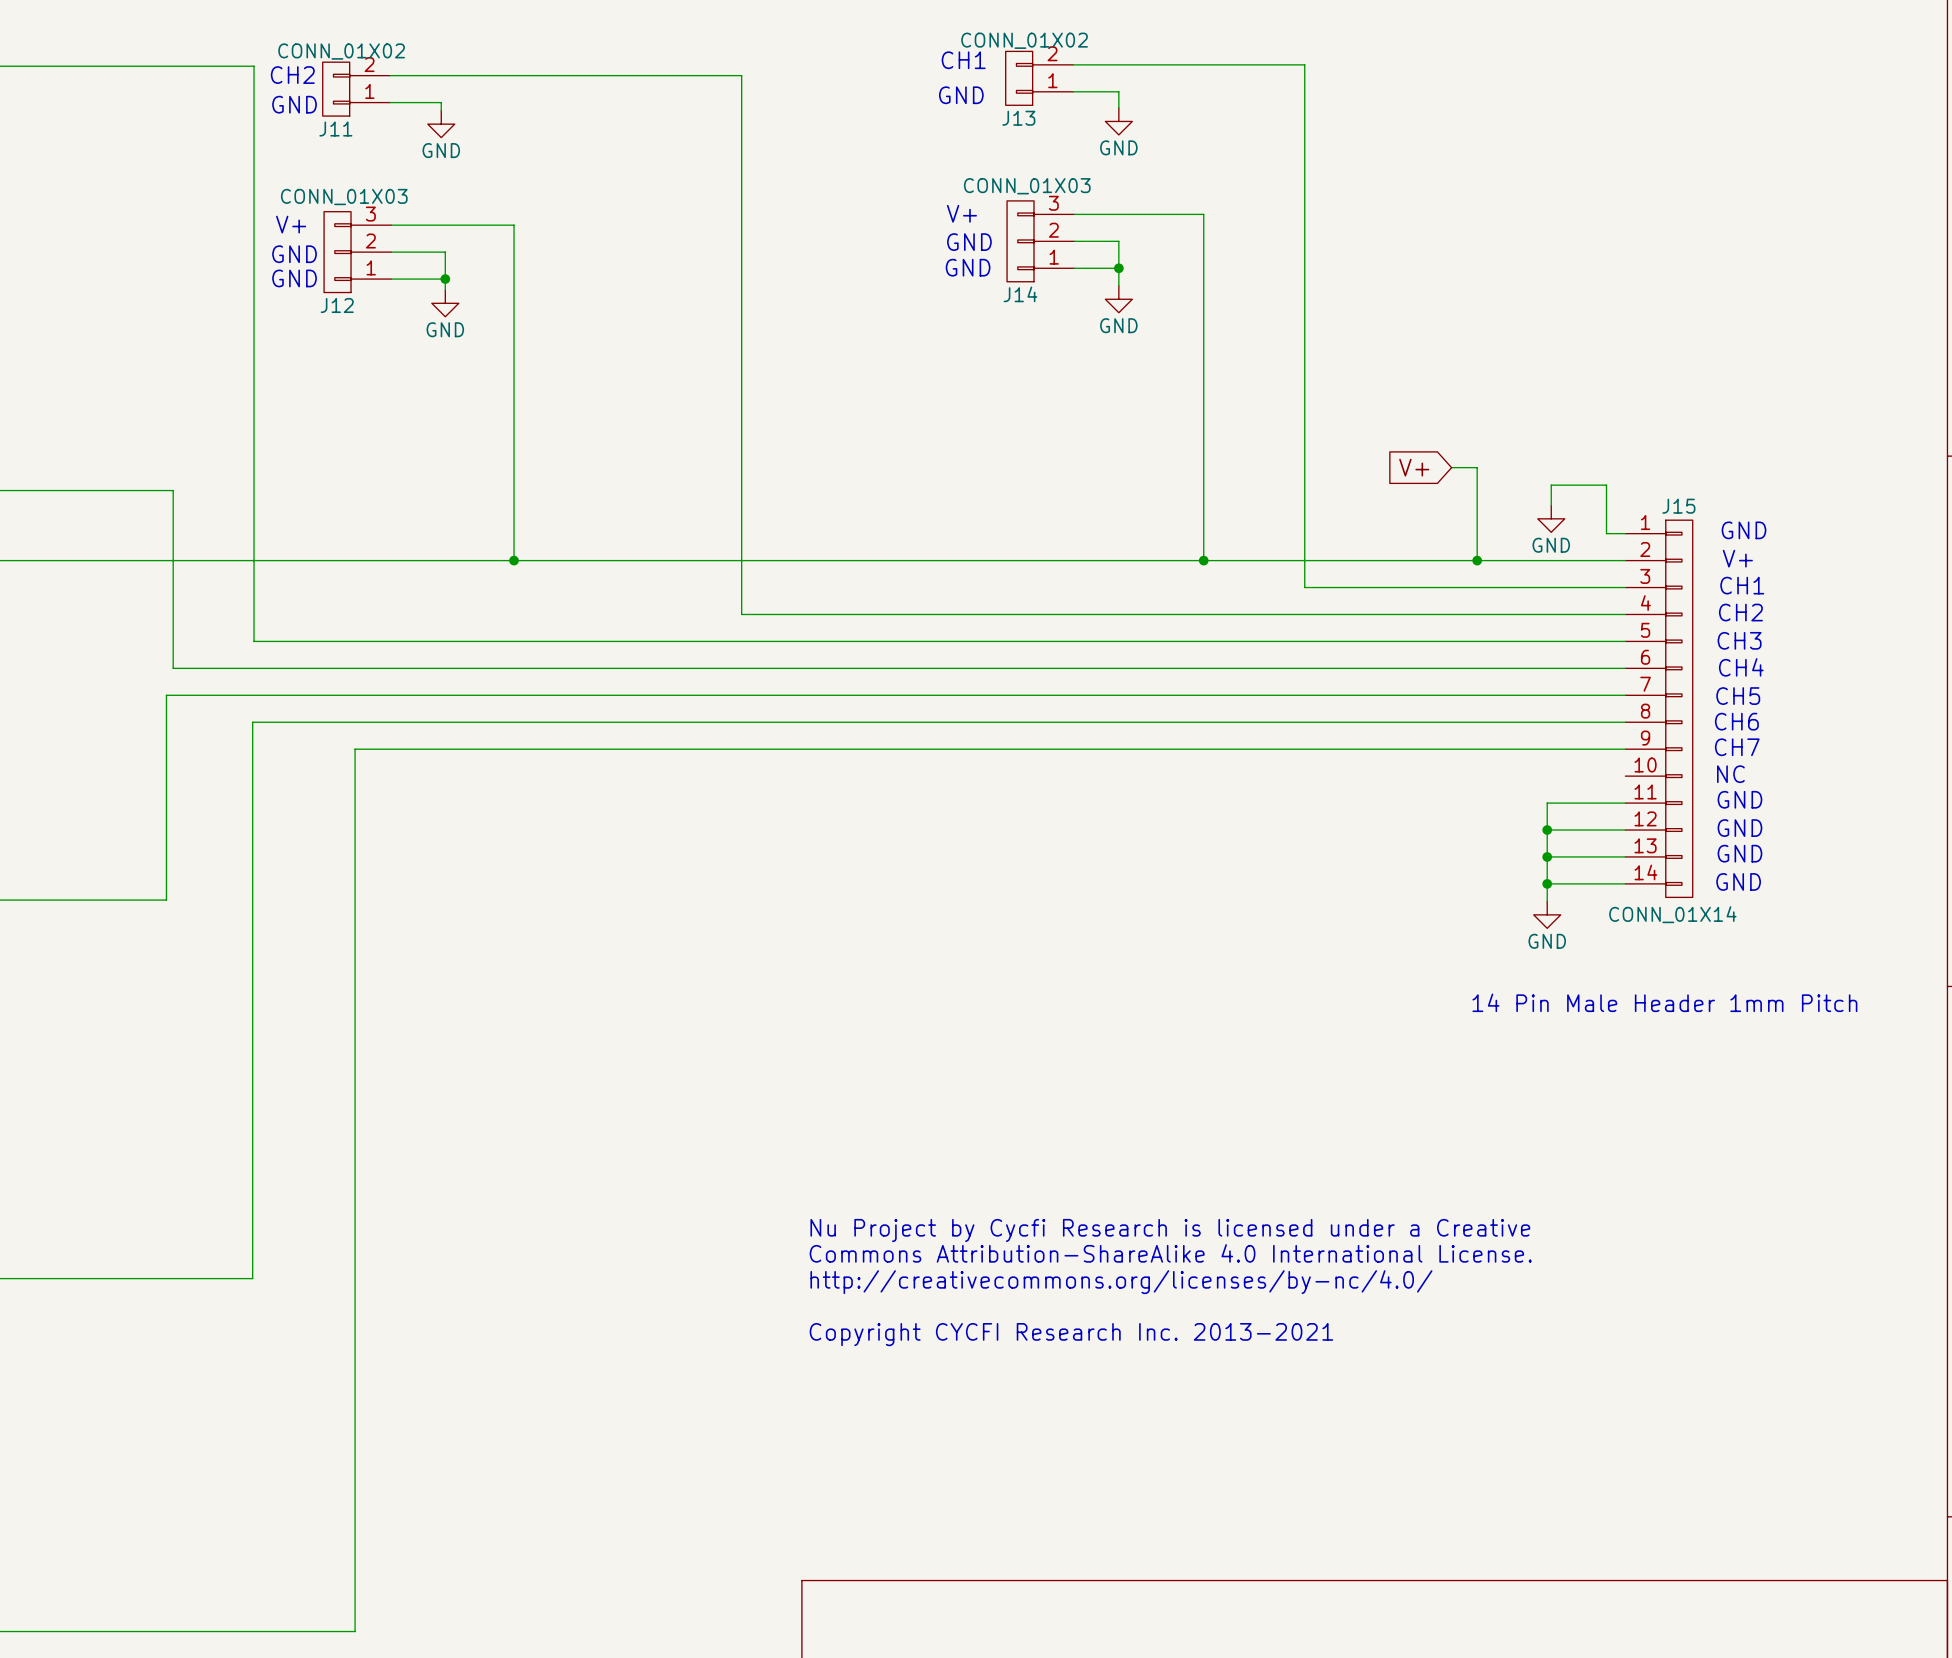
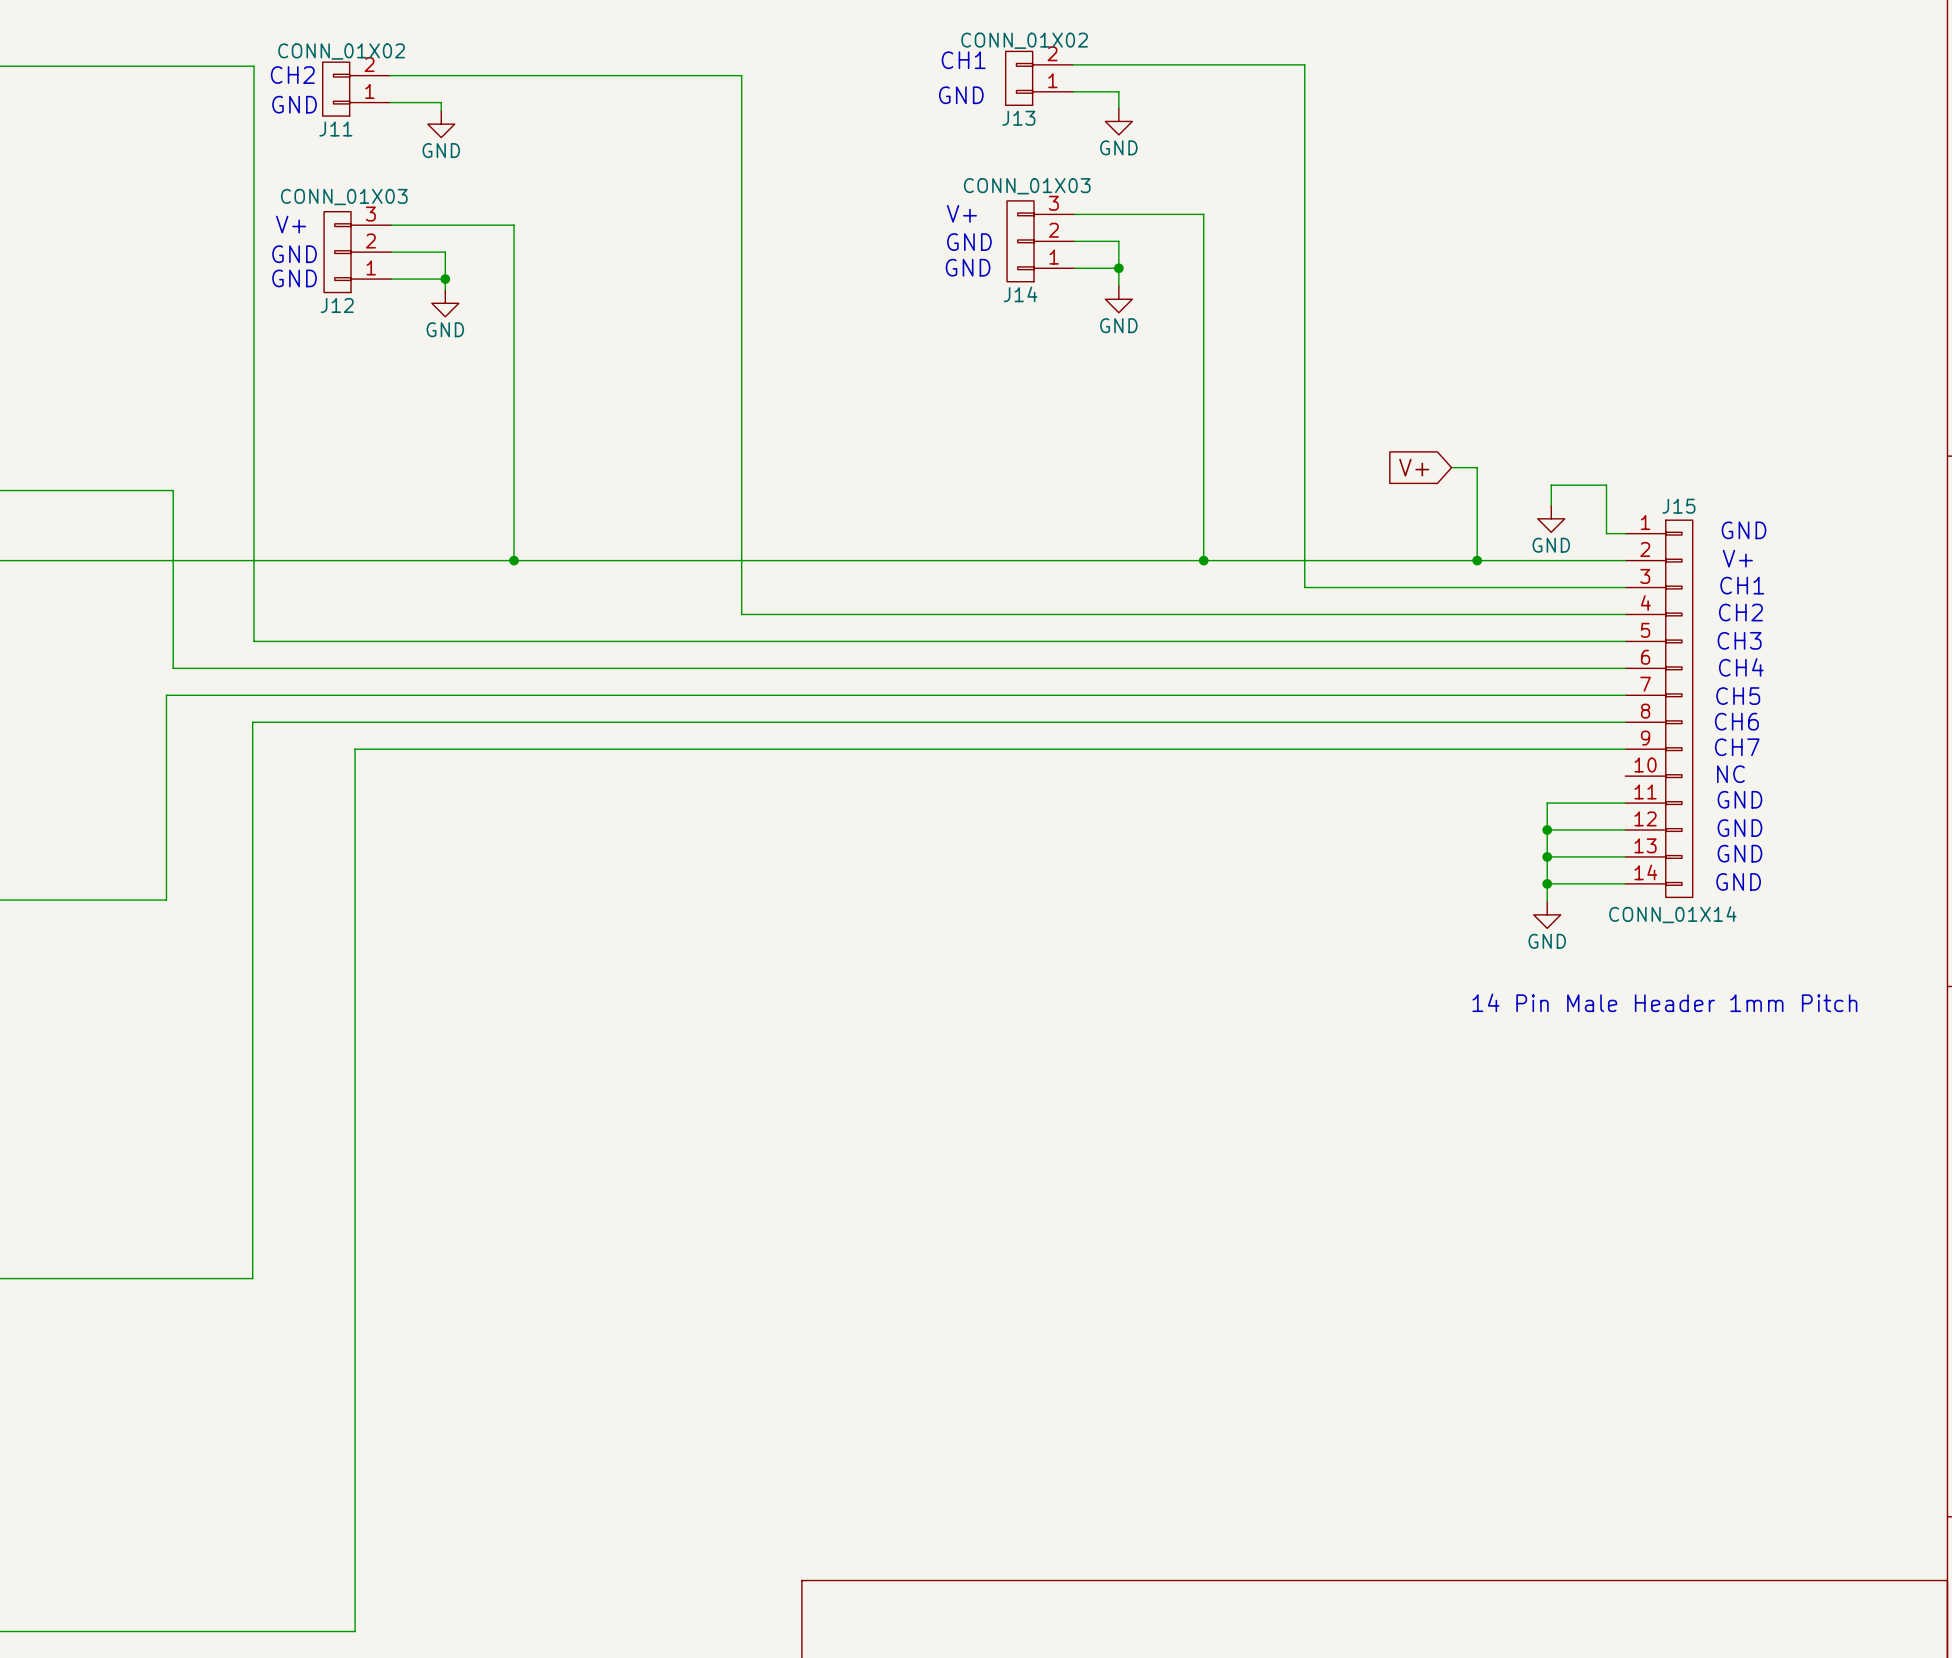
text: Nu Project by Cycfi Research is licensed under a Creative (1170, 1230) -> none
text: Commons Attribution-ShareAlike 4.0 International License. (1170, 1253) -> none
text: http://creativecommons.org/licenses/by-nc/4.0/ (1121, 1282) -> none
text: Copyright CYCFI Research Inc. 2013-2021 (1071, 1334) -> none

